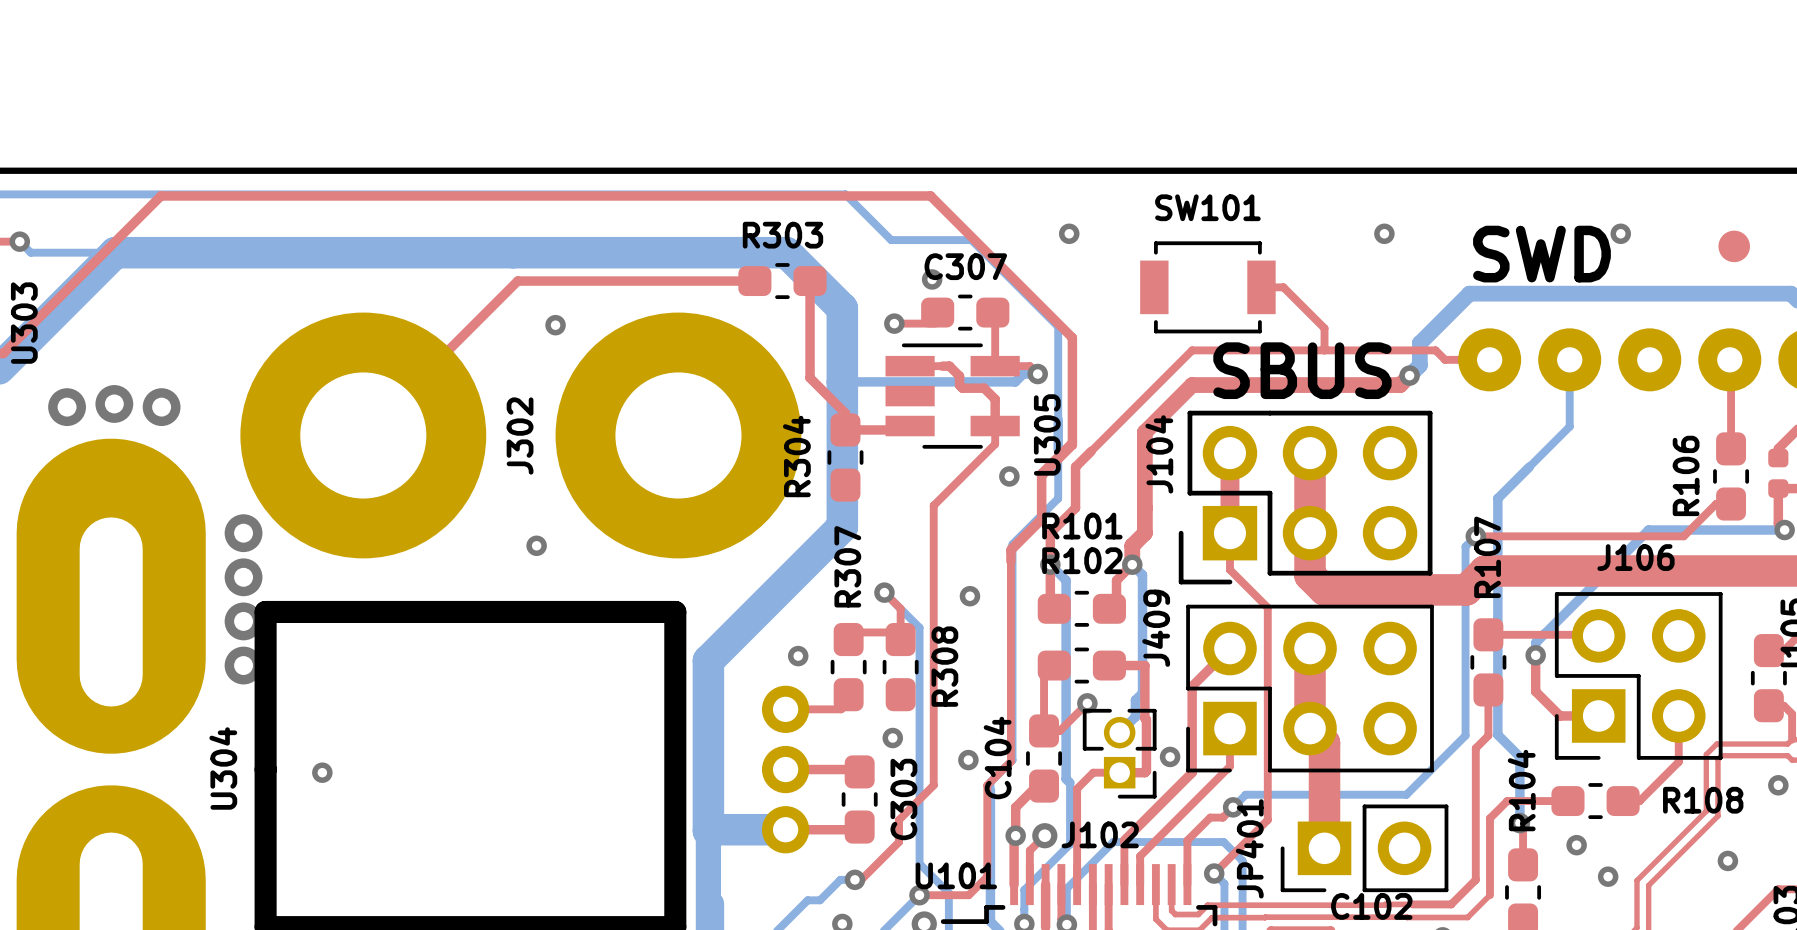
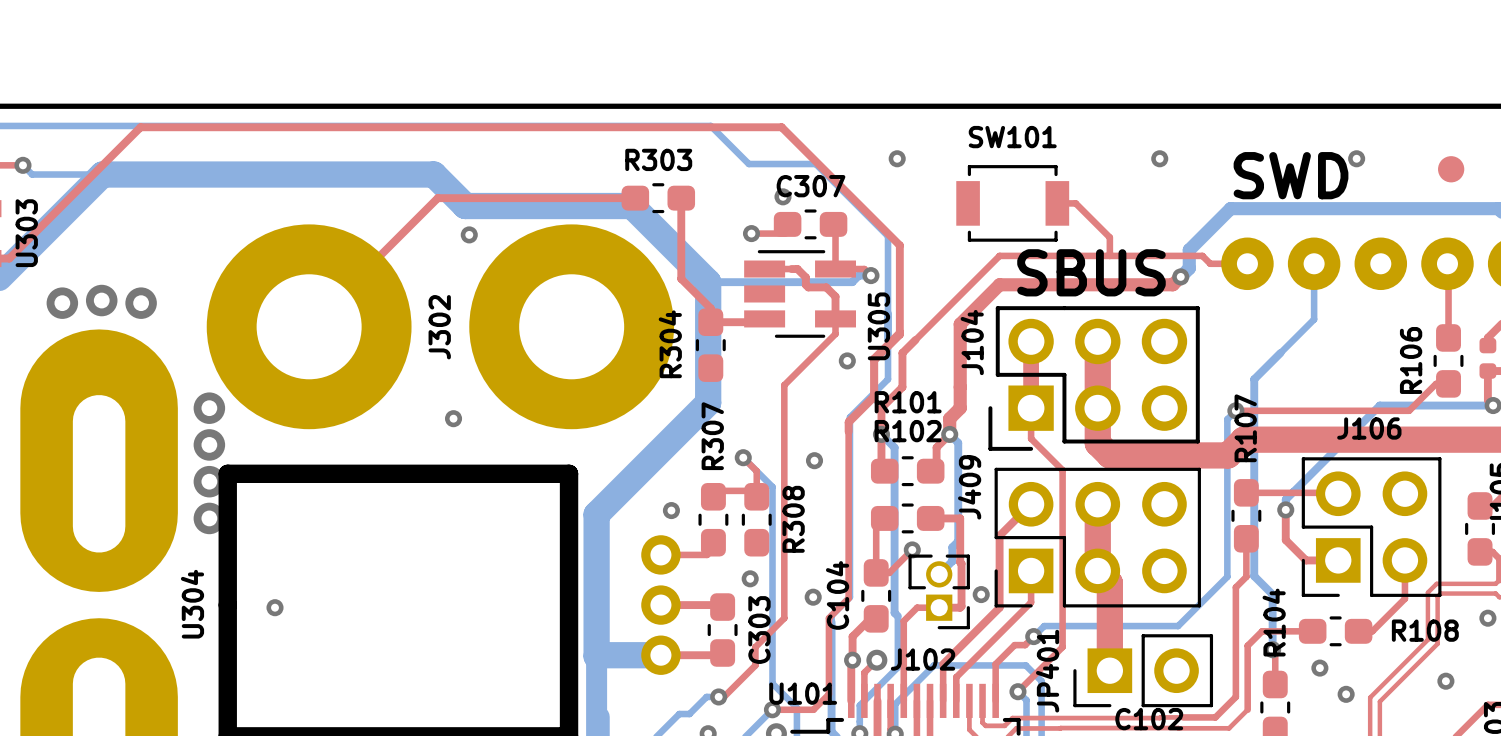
bottom track: (513, 252) (786, 252) (842, 308) (842, 381) -> (433, 174) (465, 206) (632, 206) (708, 282)

